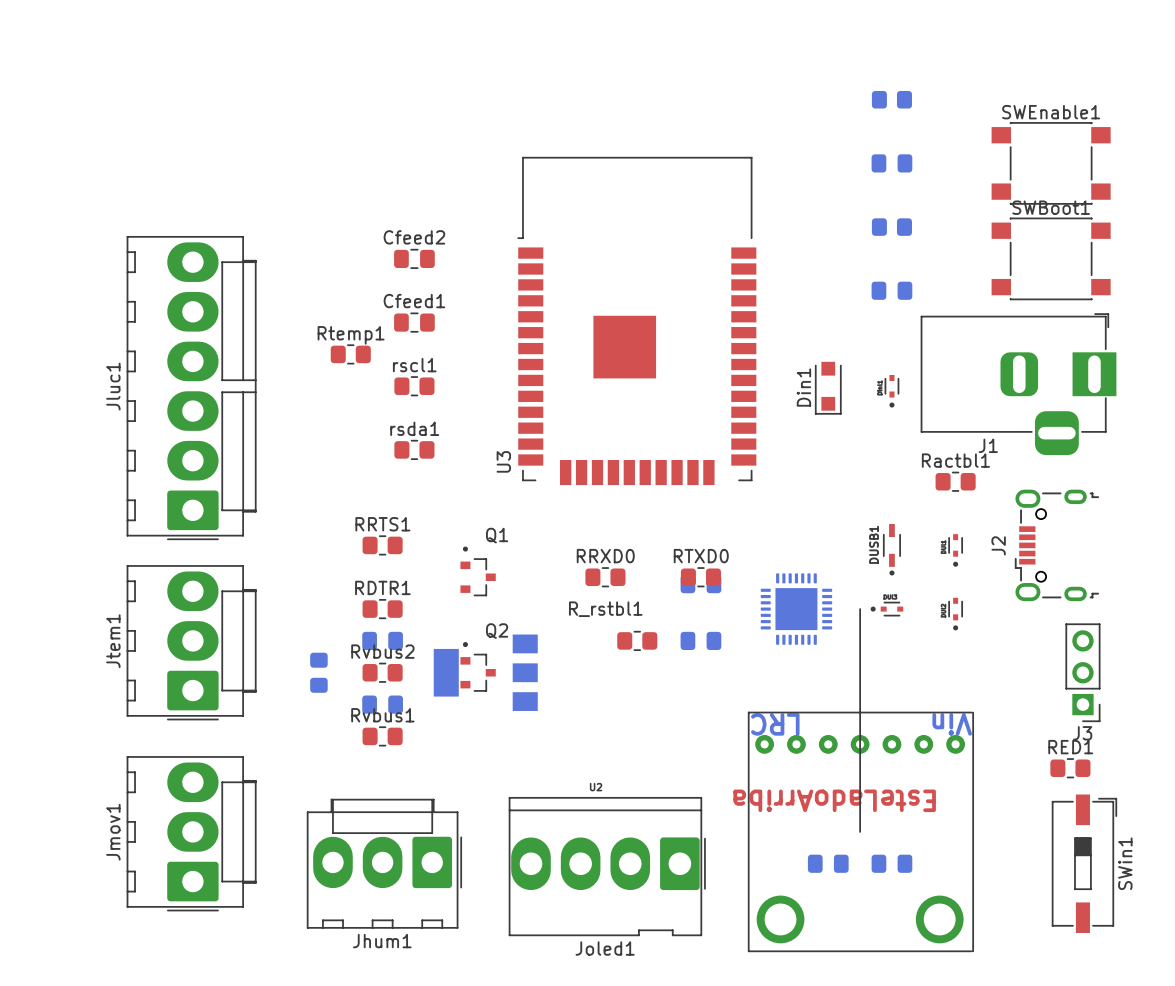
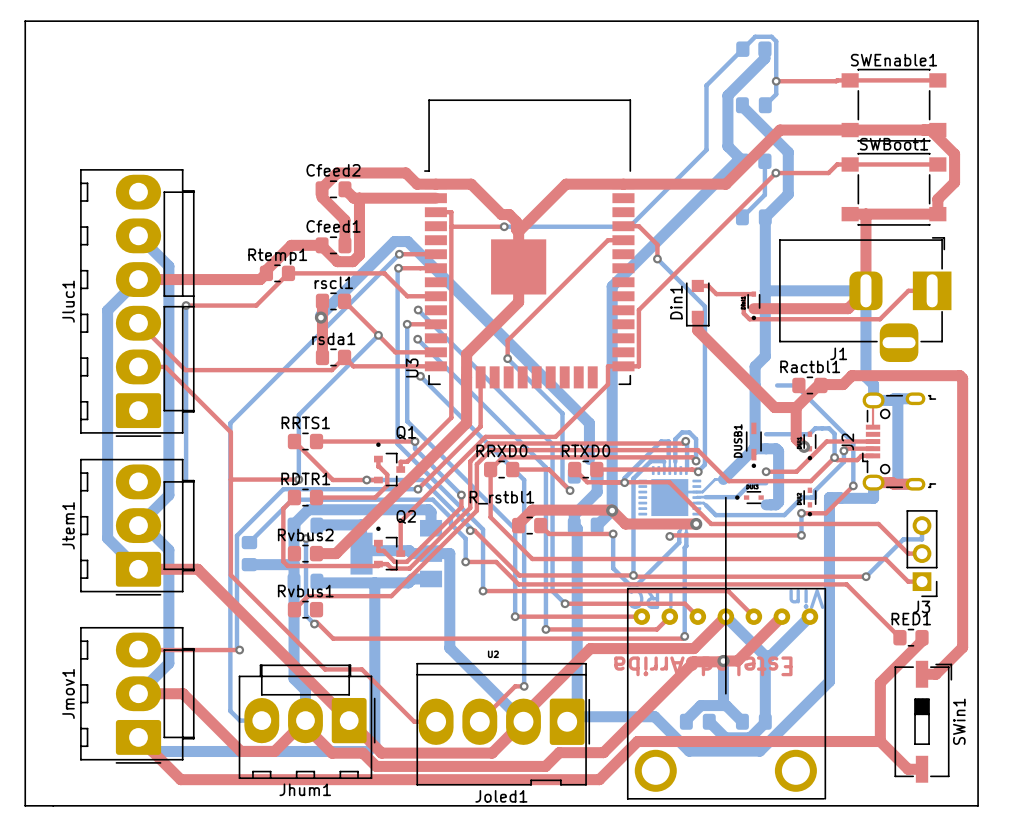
board edge: none -> (25, 21) (978, 21) (978, 805) (25, 805) (25, 21)
bottom track: none -> (764, 49) (764, 58) (727, 95) (727, 146) (742, 161) (737, 161) (612, 286) (612, 510) (597, 525)
top track: none -> (937, 80) (776, 81)
via: none -> (776, 81)
bottom track: none -> (742, 105) (788, 152) (788, 194) (765, 217) (765, 356) (755, 366) (756, 448)
bottom track: none -> (765, 105) (776, 94) (776, 41) (771, 36) (755, 36) (706, 85) (706, 149) (629, 226) (504, 226)
top track: none -> (930, 130) (954, 154) (954, 182) (937, 199) (937, 214) (850, 214)
top track: none -> (937, 130) (780, 130) (725, 184) (566, 184) (518, 231)
bottom track: none -> (764, 161) (764, 194) (742, 217)
top track: none -> (937, 164) (837, 164) (828, 173) (775, 173) (638, 310) (638, 366) (608, 366) (608, 384) (555, 436) (485, 436) (400, 521) (400, 553)
via: none -> (775, 173)
top track: none -> (344, 189) (353, 198) (435, 198)
top track: none -> (359, 198) (359, 255) (352, 261) (337, 261) (322, 245) (291, 245) (266, 270) (266, 273) (260, 279) (138, 279)
top track: none -> (435, 212) (451, 212) (451, 417) (407, 461) (400, 461) (400, 469)
top track: none -> (865, 214) (865, 290) (848, 308) (753, 308)
top track: none -> (623, 226) (638, 226) (657, 244) (657, 258)
top track: none -> (451, 226) (504, 226)
via: none -> (504, 226)
top track: none -> (518, 231) (518, 302) (466, 354) (466, 423) (336, 553) (316, 553)
top track: none -> (518, 231) (516, 229) (516, 221) (509, 214) (501, 214) (471, 184) (417, 184) (405, 172) (337, 172) (322, 188) (322, 197) (344, 220) (344, 245)
bottom track: none -> (138, 235) (168, 266) (168, 495) (138, 525)
top track: none -> (623, 240) (608, 240) (507, 340) (507, 358)
top track: none -> (399, 254) (435, 254)
bottom track: none -> (399, 254) (230, 423) (230, 711) (239, 720) (261, 720)
via: none -> (399, 254)
bottom track: none -> (657, 258) (704, 306) (704, 464) (699, 469) (696, 469) (698, 471)
via: none -> (657, 258)
top track: none -> (398, 268) (435, 268)
bottom track: none -> (398, 268) (397, 444) (483, 529) (483, 591)
via: none -> (398, 268)
bottom track: none -> (138, 279) (107, 310) (107, 538) (138, 569)
top track: none -> (697, 285) (708, 285) (716, 294) (753, 294)
bottom track: none -> (765, 290) (865, 290) (865, 377) (873, 384) (873, 400) (915, 398)
top track: none -> (932, 290) (908, 290) (880, 319) (749, 319) (743, 313) (743, 294)
top track: none -> (435, 296) (407, 296) (384, 273) (288, 273) (256, 305) (186, 305)
top track: none -> (322, 301) (322, 357)
top track: none -> (344, 301) (395, 352) (435, 352)
bottom track: none -> (186, 305) (186, 479)
via: none -> (186, 305)
bottom track: none -> (418, 310) (552, 444) (552, 591) (565, 603)
via: none -> (418, 310)
top track: none -> (697, 316) (697, 330) (774, 407) (796, 407)
bottom track: none -> (320, 317) (320, 315) (394, 241) (407, 241) (589, 423) (589, 459)
via: none -> (320, 317)
top track: none -> (138, 323) (185, 370) (331, 370) (344, 357) (353, 366) (435, 366)
top track: none -> (407, 324) (435, 324)
bottom track: none -> (407, 324) (407, 421) (515, 529) (515, 616)
via: none -> (407, 324)
bottom track: none -> (378, 335) (298, 414) (298, 479)
via: none -> (378, 335)
bottom track: none -> (417, 339) (545, 467) (545, 629)
via: none -> (417, 339)
bottom track: none -> (507, 358) (562, 413) (562, 483) (570, 490)
via: none -> (507, 358)
top track: none -> (138, 366) (165, 366) (230, 432) (230, 575) (325, 669) (361, 669) (414, 721) (436, 721)
bottom track: none -> (420, 376) (524, 480) (524, 686)
via: none -> (420, 376)
top track: none -> (480, 377) (480, 426) (418, 489)
bottom track: none -> (777, 385) (795, 385) (853, 442) (853, 485)
bottom track: none -> (897, 398) (897, 484) (915, 484)
top track: none -> (873, 400) (873, 427)
top track: none -> (796, 407) (796, 438) (804, 446)
top track: none -> (796, 407) (819, 384) (843, 384) (851, 375) (959, 375) (962, 378) (962, 647) (935, 674) (922, 674)
bottom track: none -> (766, 434) (809, 434) (815, 428) (829, 428) (834, 433) (834, 457)
top track: none -> (294, 441) (332, 480) (378, 480)
top track: none -> (316, 441) (415, 441)
bottom track: none -> (415, 441) (415, 448) (461, 495)
via: none -> (415, 441)
top track: none -> (685, 441) (683, 443) (488, 443) (470, 461) (470, 507) (409, 568) (391, 568) (387, 564) (378, 564) (378, 566) (287, 566) (283, 561) (283, 508) (294, 497)
bottom track: none -> (685, 441) (686, 470)
via: none -> (685, 441)
top track: none -> (873, 441) (826, 441) (796, 471) (766, 471)
via: none -> (804, 446)
top track: none -> (873, 448) (846, 448) (843, 450)
bottom track: none -> (843, 450) (843, 461) (814, 490) (814, 497) (802, 497) (784, 515) (715, 515) (703, 503) (696, 503)
via: none -> (843, 450)
top track: none -> (873, 455) (861, 455) (857, 460) (837, 460) (834, 457) (810, 481) (728, 481) (697, 450) (491, 450) (476, 464) (476, 510) (391, 596) (307, 596) (294, 609)
via: none -> (834, 457)
top track: none -> (378, 459) (378, 466) (387, 474) (387, 485) (375, 497) (316, 497)
top track: none -> (696, 461) (692, 457) (502, 457) (490, 469) (490, 517) (532, 559) (885, 559) (908, 581) (922, 581)
bottom track: none -> (696, 461) (696, 439) (689, 432) (682, 432) (675, 439) (675, 470)
via: none -> (696, 461)
top track: none -> (512, 469) (549, 469) (570, 490)
top track: none -> (574, 469) (587, 482) (669, 482) (711, 523) (878, 523) (908, 553) (922, 553)
top track: none -> (596, 469) (692, 469) (698, 471)
bottom track: none -> (664, 470) (663, 461) (650, 461) (633, 478) (633, 575)
bottom track: none -> (669, 470) (668, 441) (661, 441) (624, 478) (624, 482)
via: none -> (698, 471)
via: none -> (766, 471)
bottom track: none -> (597, 475) (597, 492) (574, 514) (574, 525) (577, 528) (577, 716)
top track: none -> (230, 479) (298, 479)
via: none -> (298, 479)
bottom track: none -> (366, 480) (422, 480) (470, 527) (470, 530)
via: none -> (366, 480)
via: none -> (624, 482)
bottom track: none -> (766, 483) (751, 483) (737, 497) (696, 497)
top track: none -> (873, 482) (915, 484)
bottom track: none -> (873, 482) (873, 498) (829, 497) (829, 681) (759, 751) (689, 751) (654, 716) (572, 716) (567, 721)
top track: none -> (853, 485) (825, 513) (801, 513)
via: none -> (853, 485)
bottom track: none -> (418, 489) (283, 489) (236, 535) (236, 647) (239, 650)
via: none -> (418, 489)
via: none -> (570, 490)
top track: none -> (461, 495) (461, 507) (406, 561) (394, 561) (383, 550) (378, 550) (378, 543)
via: none -> (461, 495)
bottom track: none -> (669, 497) (675, 492) (702, 492) (715, 479) (723, 479) (754, 448) (776, 448) (778, 451) (778, 502) (776, 504) (766, 504)
via: none -> (612, 510)
bottom track: none -> (801, 513) (801, 535)
via: none -> (801, 513)
bottom track: none -> (141, 522) (168, 550) (168, 663) (138, 693)
bottom track: none -> (680, 524) (679, 542) (637, 584) (629, 584) (613, 568) (613, 533)
bottom track: none -> (686, 524) (684, 636)
top track: none -> (696, 524) (625, 524) (611, 510) (532, 510) (518, 525)
via: none -> (696, 524)
bottom track: none -> (294, 525) (308, 509) (428, 509) (431, 512) (431, 528)
bottom track: none -> (316, 525) (361, 524) (361, 553)
top track: none -> (540, 525) (549, 533) (613, 533)
bottom track: none -> (922, 525) (922, 539) (903, 539) (866, 576)
bottom track: none -> (293, 525) (293, 564) (249, 564)
top track: none -> (470, 530) (474, 530) (519, 575) (866, 576)
via: none -> (470, 530)
via: none -> (613, 533)
top track: none -> (801, 535) (669, 536)
via: none -> (801, 535)
via: none -> (669, 536)
bottom track: none -> (306, 538) (306, 615) (314, 624)
via: none -> (306, 538)
bottom track: none -> (249, 542) (292, 499) (432, 499) (450, 517) (450, 523) (465, 538) (465, 561)
bottom track: none -> (361, 550) (409, 550) (412, 553) (449, 553) (449, 648) (523, 721)
top track: none -> (465, 561) (496, 561) (518, 584) (846, 584) (899, 637)
via: none -> (465, 561)
bottom track: none -> (294, 564) (294, 678) (305, 690) (305, 720)
top track: none -> (138, 569) (197, 569) (381, 753) (492, 753) (523, 721) (523, 715) (590, 648) (693, 648) (725, 616)
via: none -> (633, 575)
via: none -> (866, 576)
bottom track: none -> (431, 578) (412, 578) (408, 582) (316, 581)
bottom track: none -> (374, 582) (374, 744) (367, 751) (152, 751) (138, 737)
top track: none -> (483, 591) (728, 591) (753, 616)
via: none -> (483, 591)
top track: none -> (565, 603) (684, 603) (697, 616)
via: none -> (565, 603)
top track: none -> (515, 616) (641, 616)
via: none -> (515, 616)
top track: none -> (669, 616) (657, 629) (545, 629)
bottom track: none -> (725, 616) (765, 656)
top track: none -> (781, 616) (737, 661) (694, 661) (603, 752) (559, 752) (545, 766) (376, 766) (363, 753) (332, 753) (302, 723)
bottom track: none -> (809, 616) (770, 656) (765, 656)
top track: none -> (314, 624) (316, 622) (333, 638) (682, 638) (684, 636)
via: none -> (314, 624)
via: none -> (545, 629)
via: none -> (684, 636)
top track: none -> (922, 637) (922, 641) (880, 682) (880, 741)
top track: none -> (138, 650) (239, 650)
via: none -> (239, 650)
bottom track: none -> (765, 656) (765, 722) (750, 737) (725, 737) (709, 721)
bottom track: none -> (723, 661) (723, 705)
via: none -> (723, 661)
top track: none -> (524, 686) (515, 686) (479, 721)
via: none -> (524, 686)
top track: none -> (138, 693) (183, 693) (240, 751) (274, 751) (305, 720)
bottom track: none -> (686, 721) (700, 705) (726, 705) (742, 721)
top track: none -> (138, 737) (180, 779) (599, 779) (637, 741) (880, 741)
top track: none -> (880, 741) (908, 769) (922, 769)

